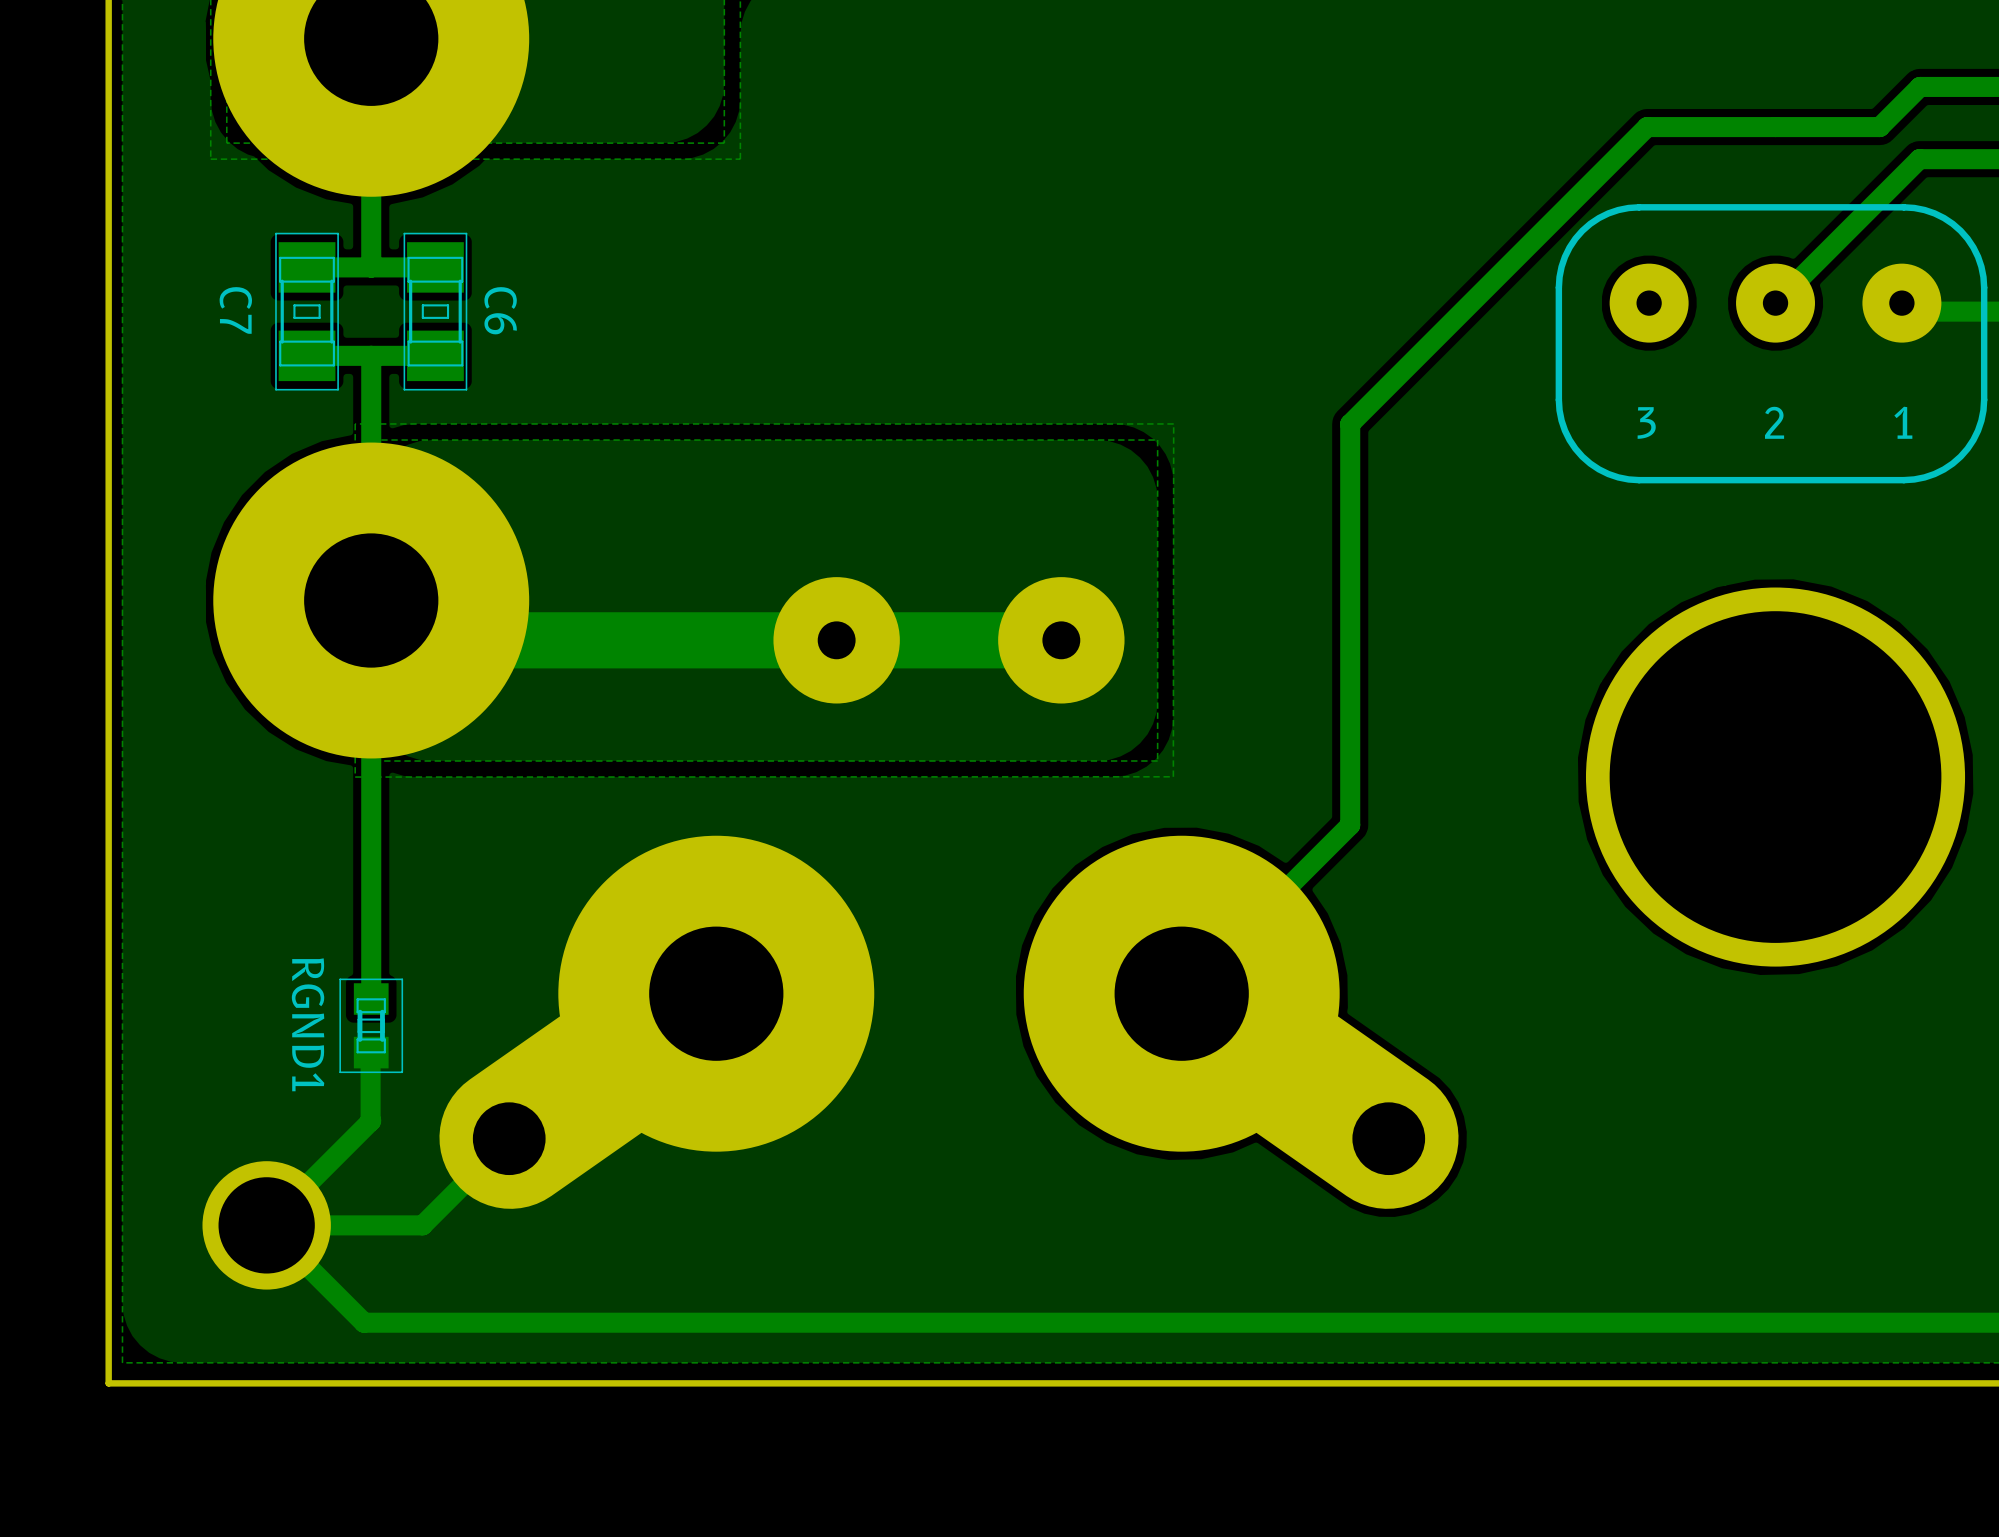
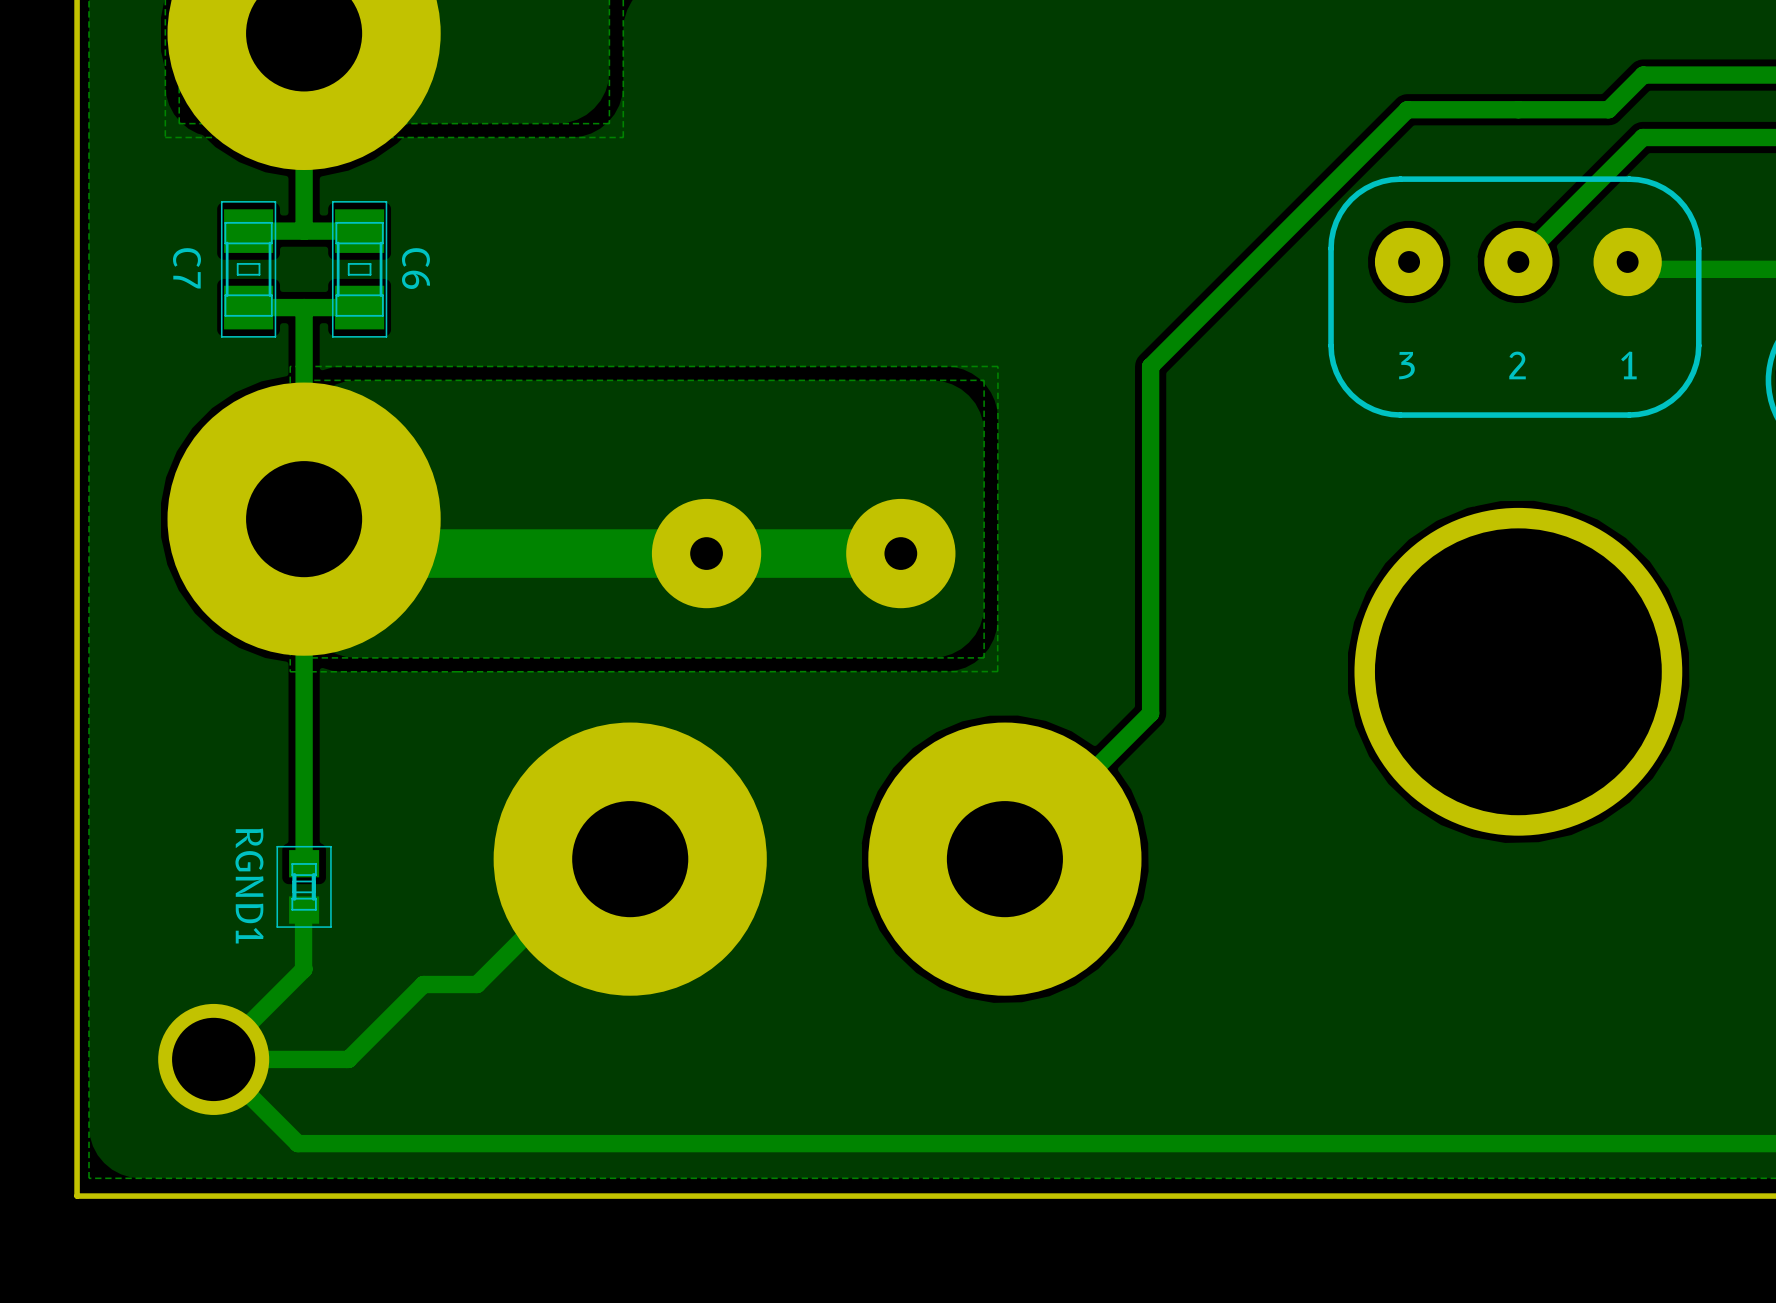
part: none -> (630, 859)
part: none -> (1004, 859)
part: (656, 1022) -> none
part: (1241, 1022) -> none

